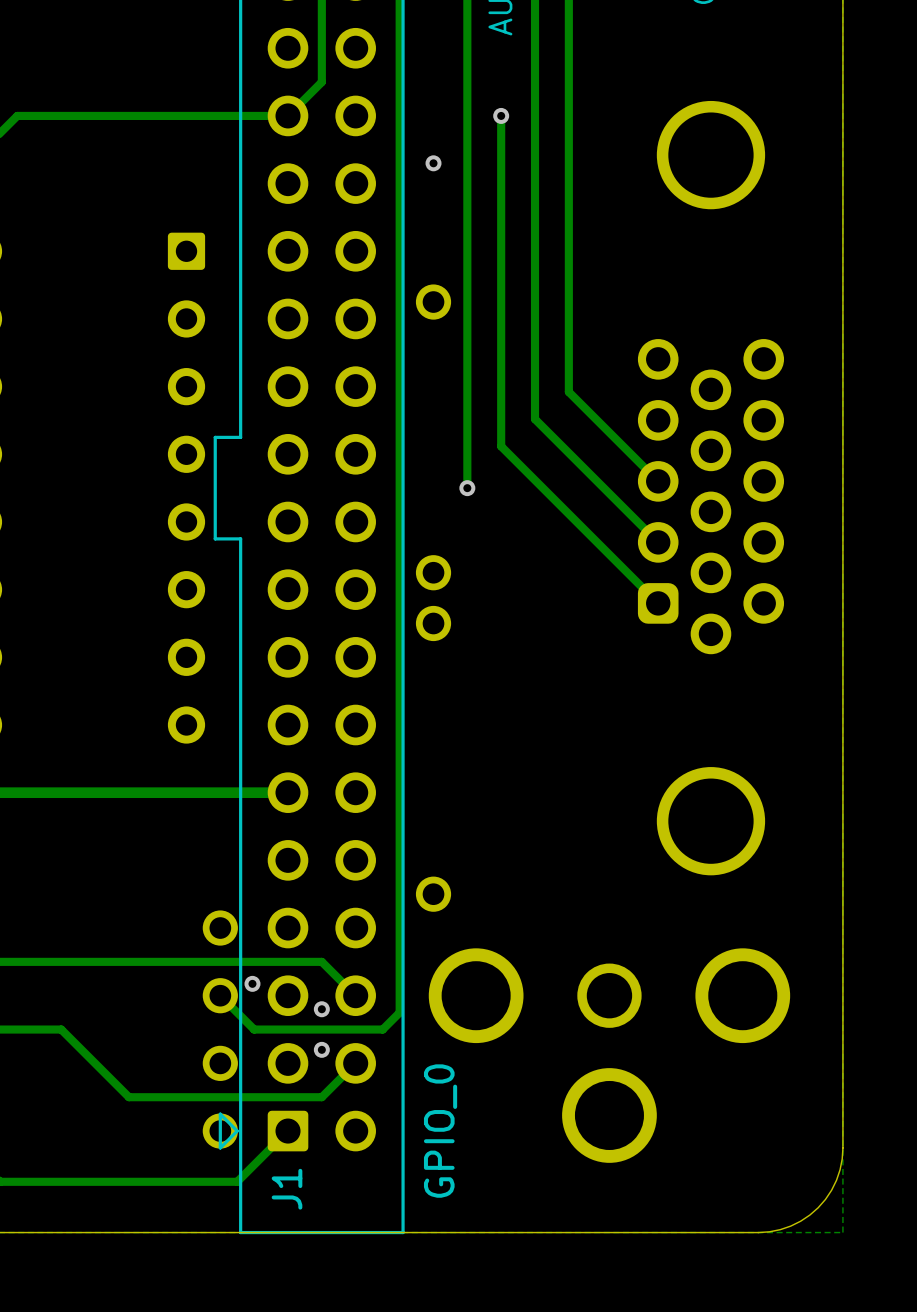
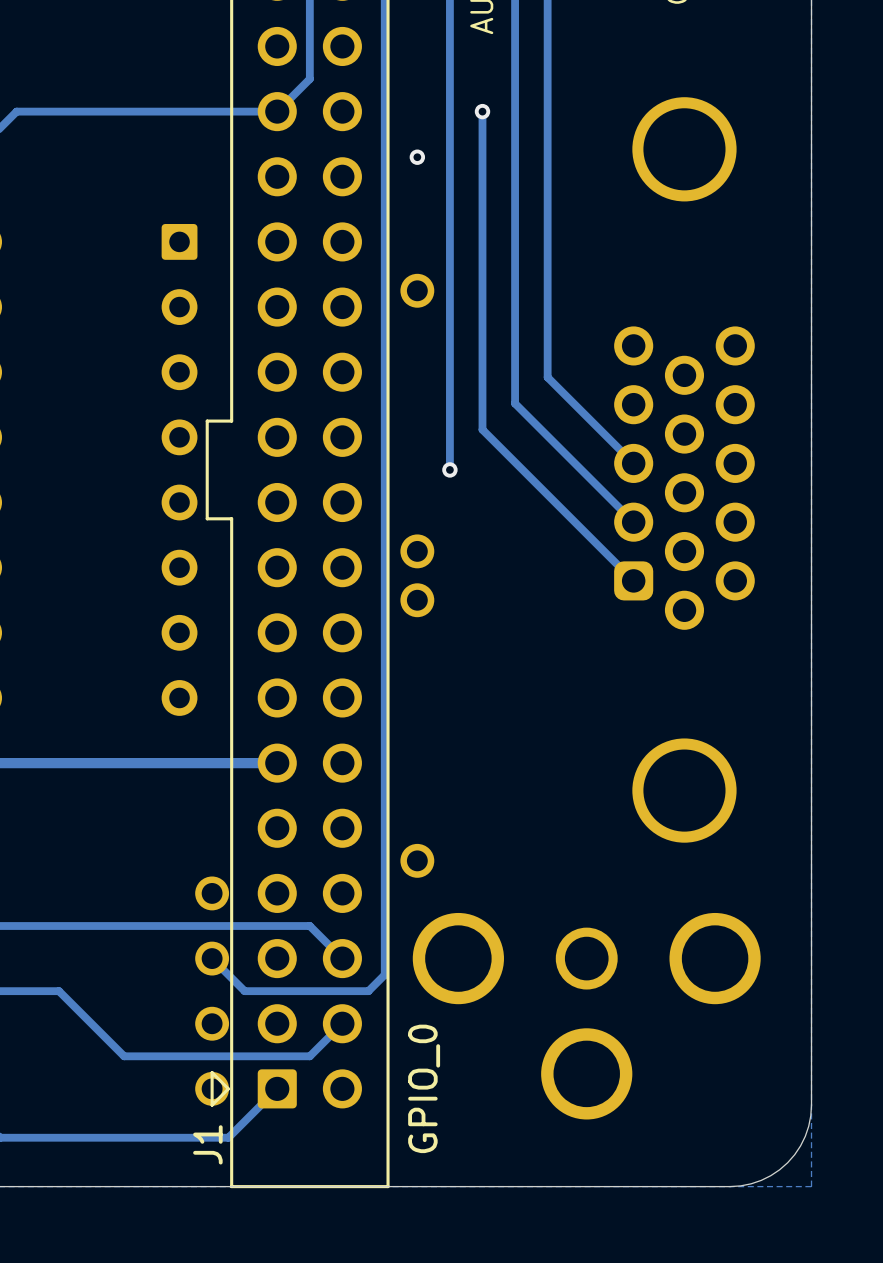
via: (252, 983) -> none
via: (321, 1009) -> none
via: (321, 1049) -> none
J1 name position: J1 (287, 1189) -> J1 (207, 1144)

